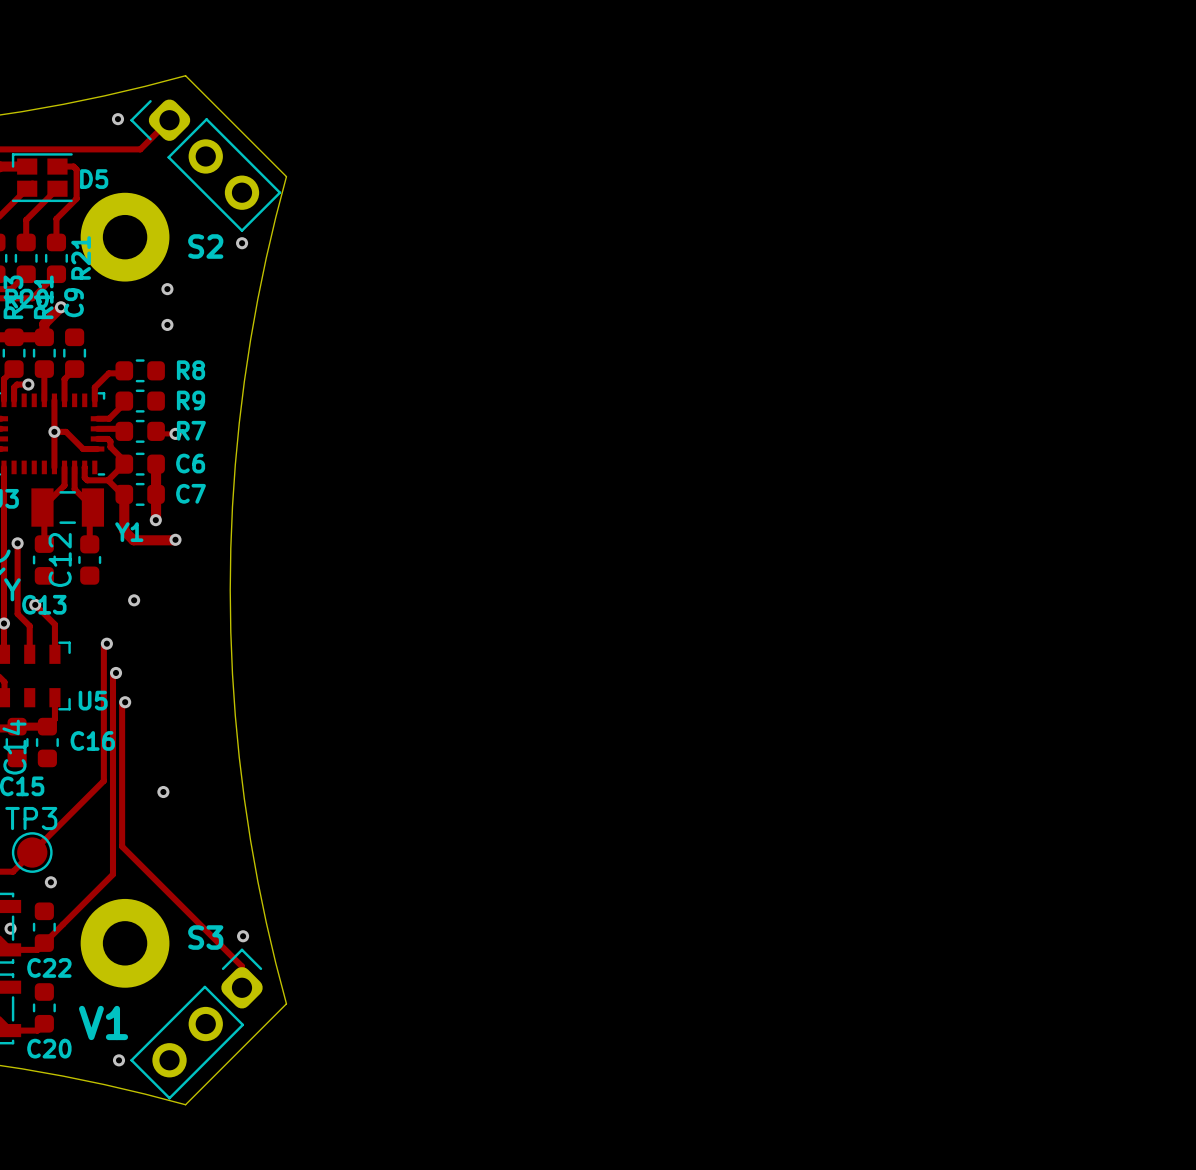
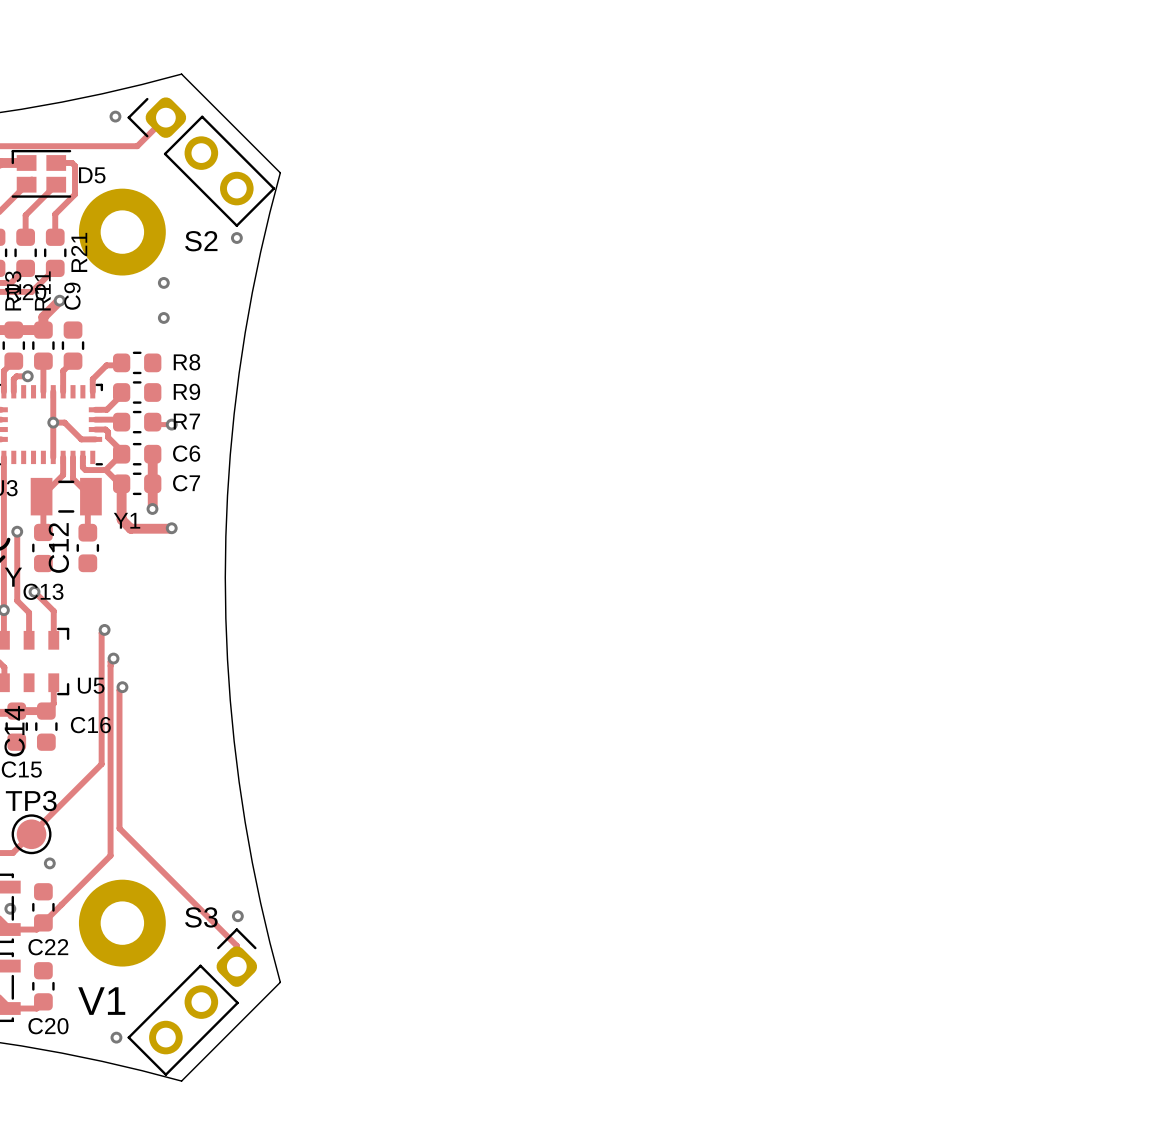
via: (134, 600) -> none
via: (163, 792) -> none

